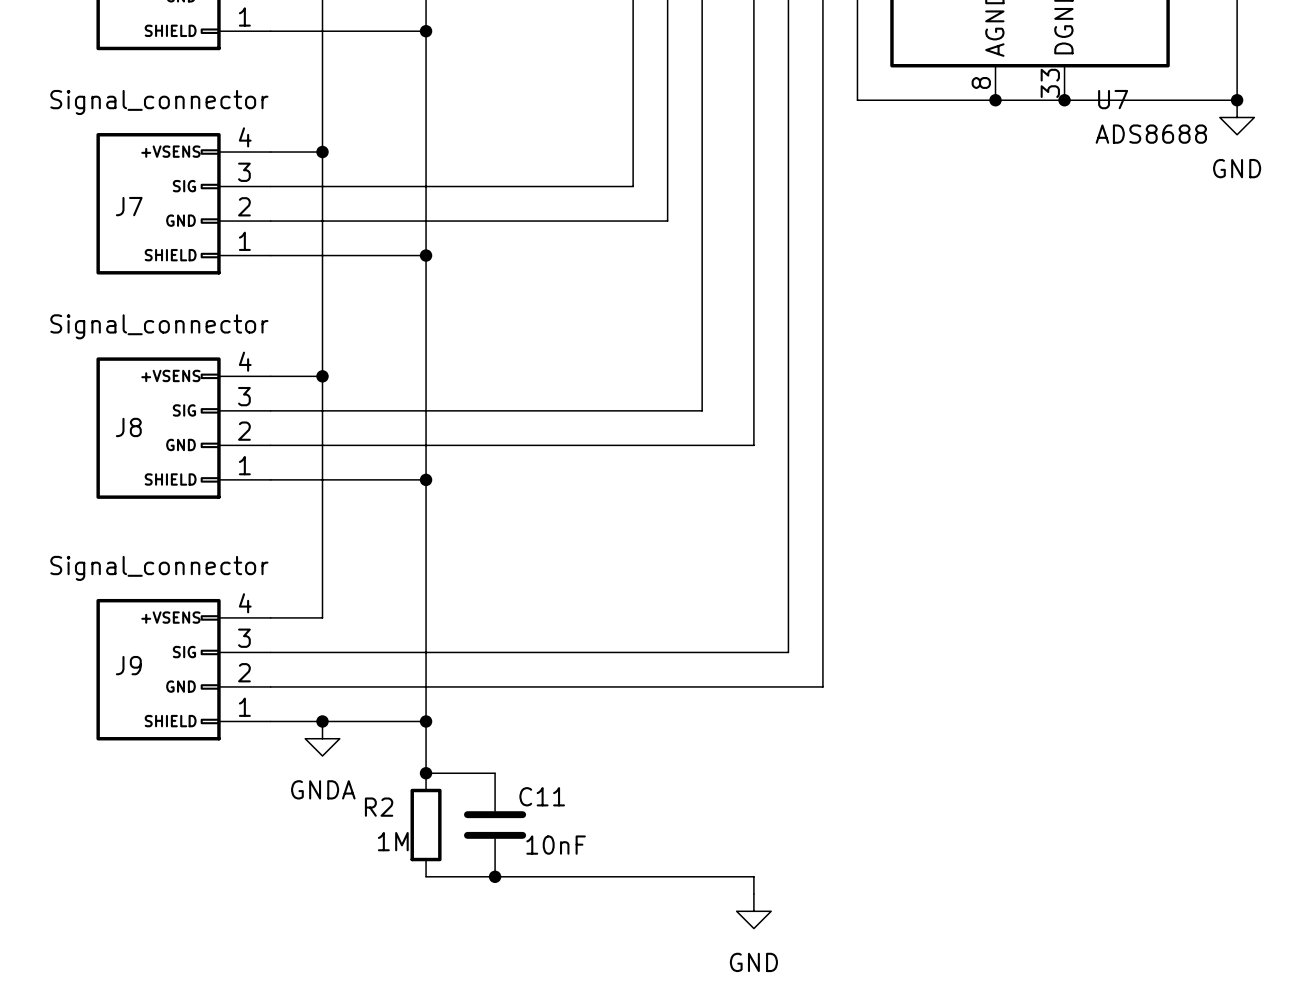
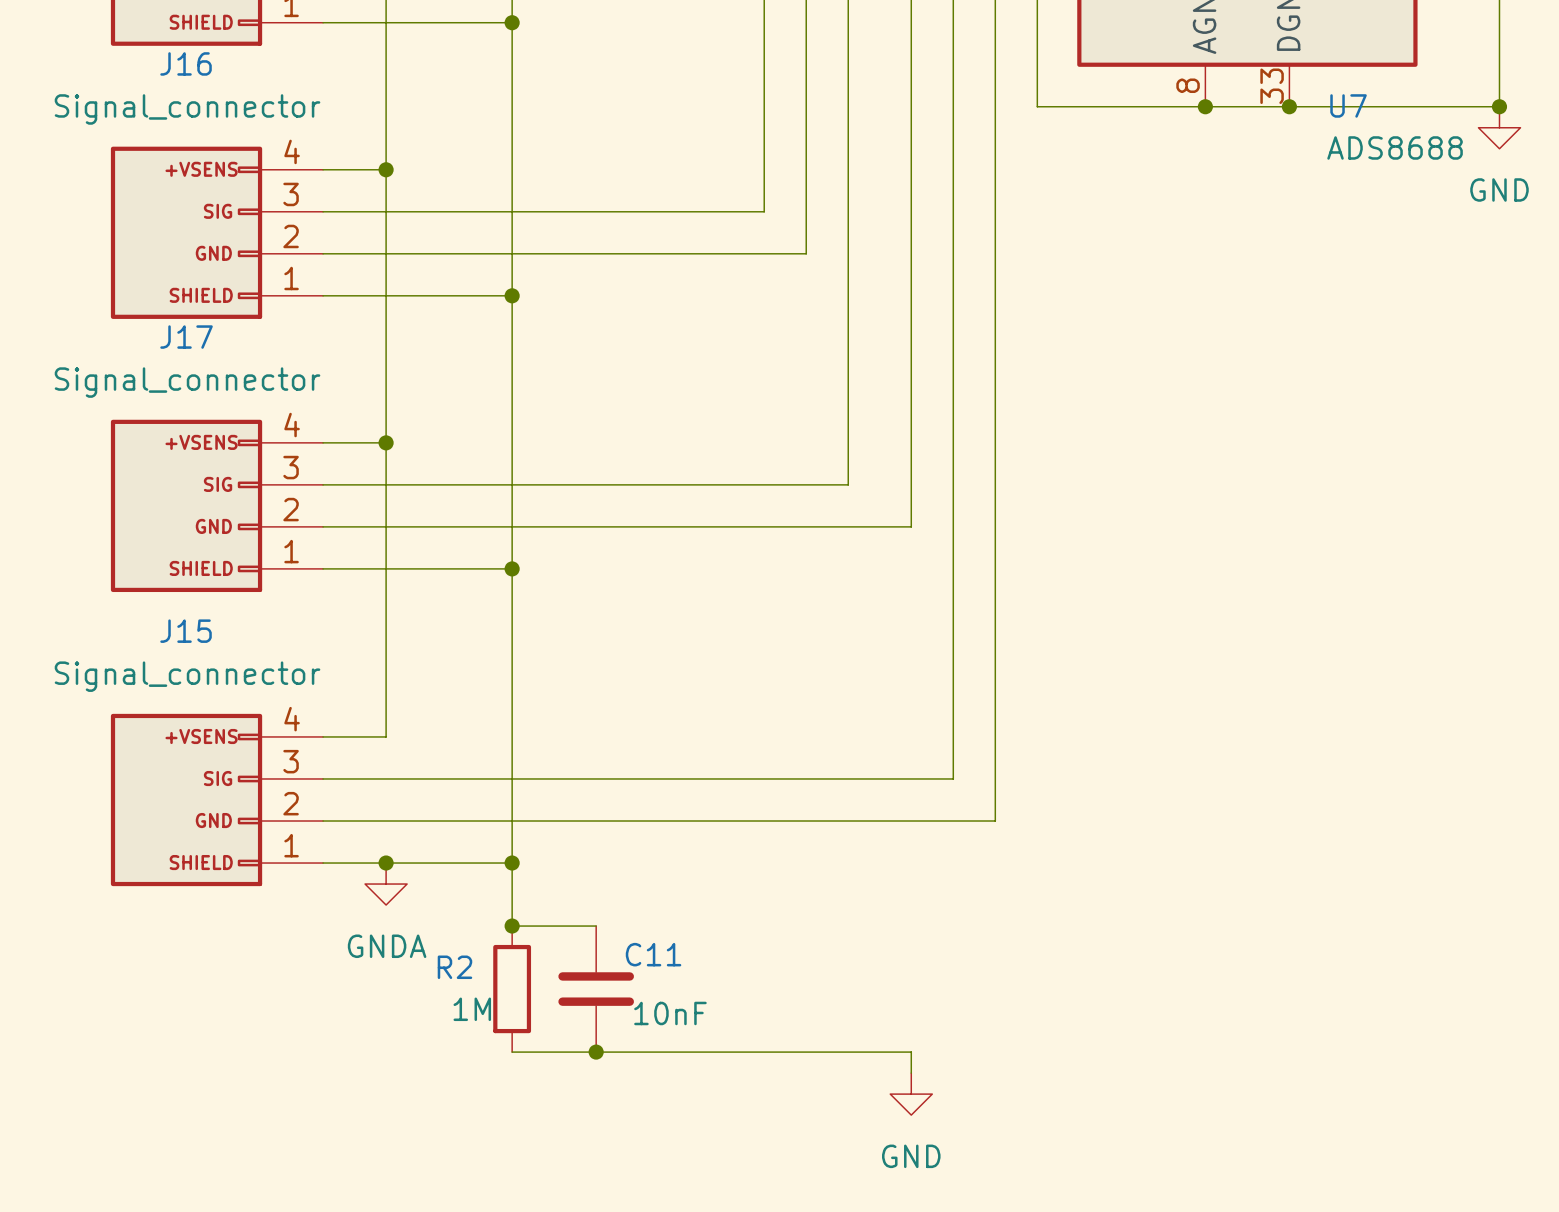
J7 name: J7 (129, 206) -> J16 (186, 63)
J8 name: J8 (128, 427) -> J17 (186, 337)
J9 name: J9 (128, 665) -> J15 (186, 631)

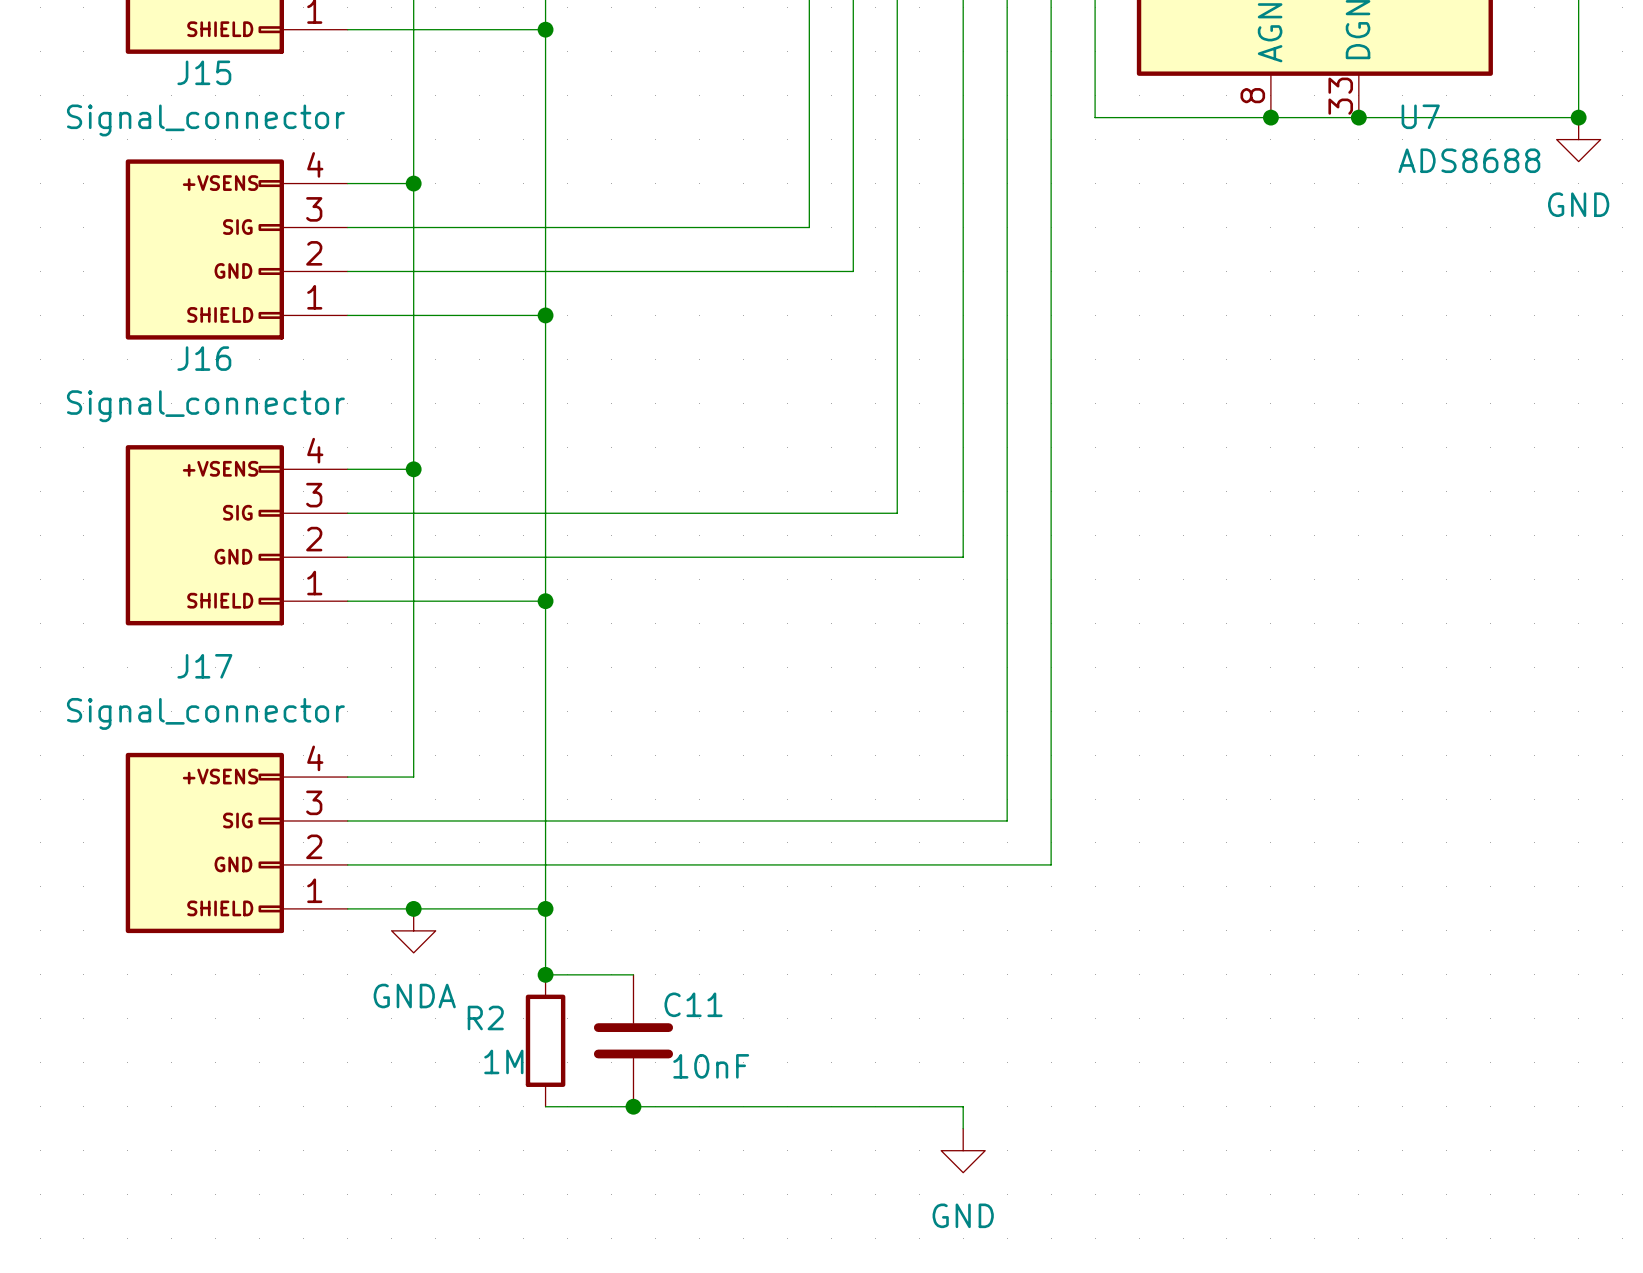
J16 name: J16 (186, 63) -> J15 (204, 72)
J17 name: J17 (186, 337) -> J16 (204, 358)
J15 name: J15 (186, 631) -> J17 (204, 666)

